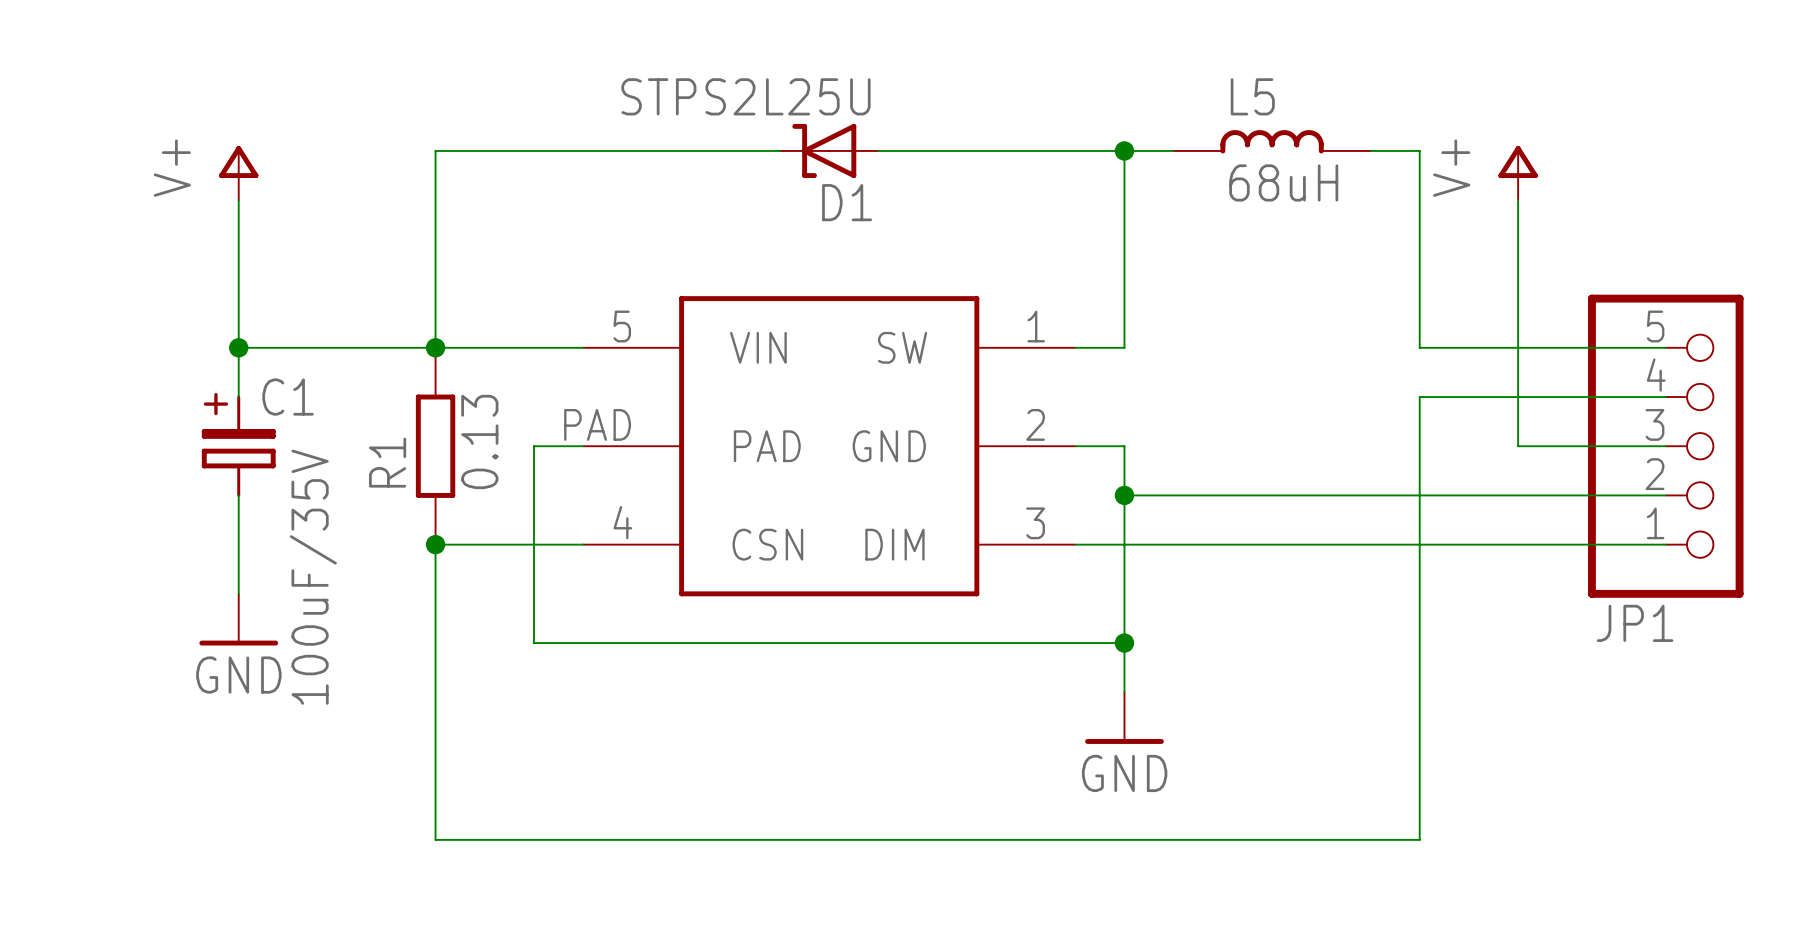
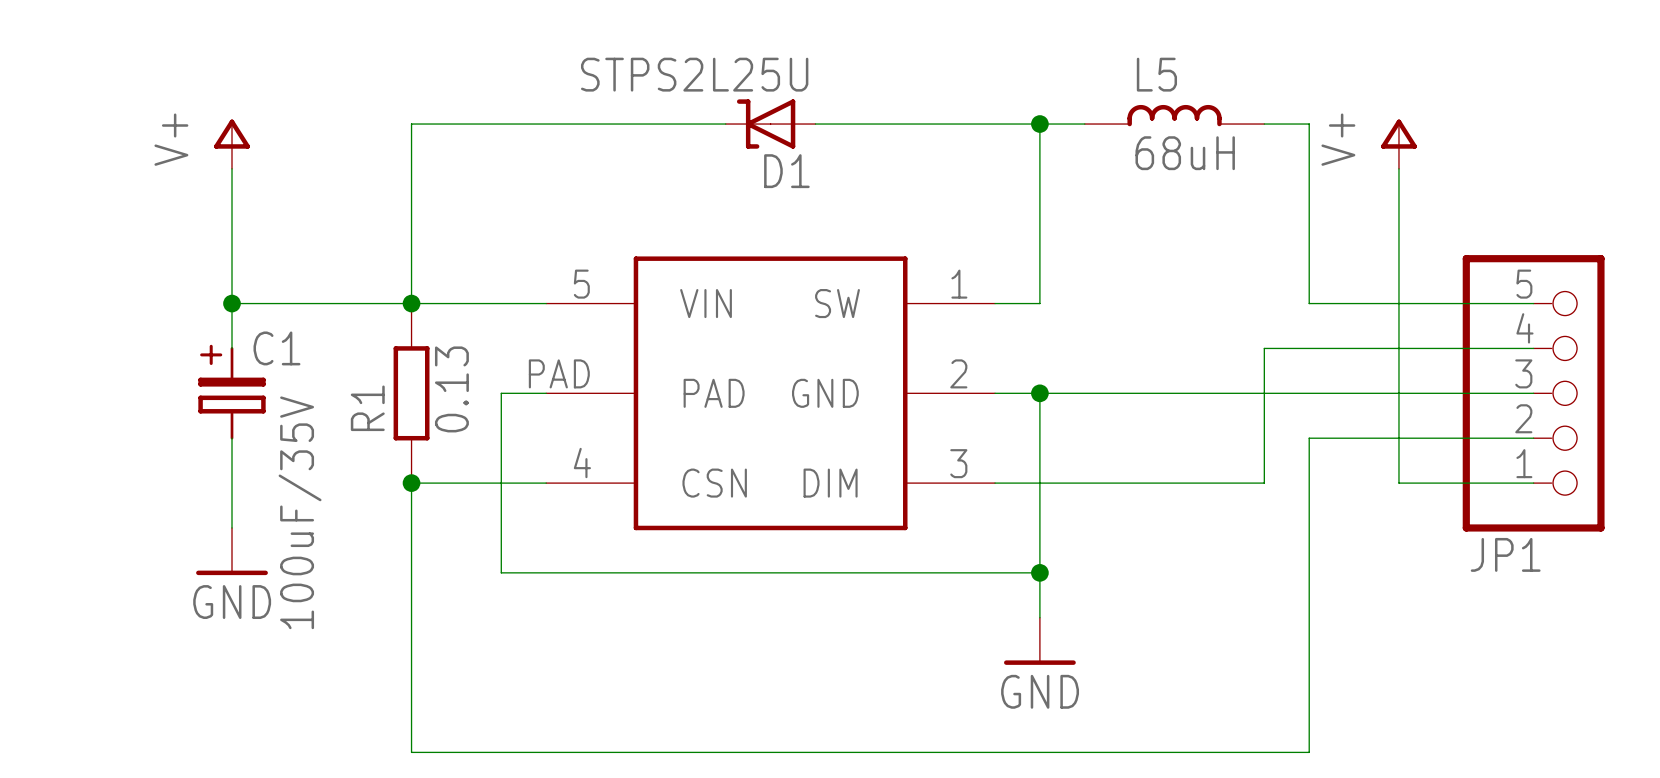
wire: (1419, 397) (1419, 495) (1124, 495) -> none
wire: none -> (1039, 393) (1398, 393) (1398, 483)
junction position: (1124, 495) -> (1039, 393)
wire: (1370, 544) (1518, 544) -> (1264, 483) (1264, 348) (1309, 348)

